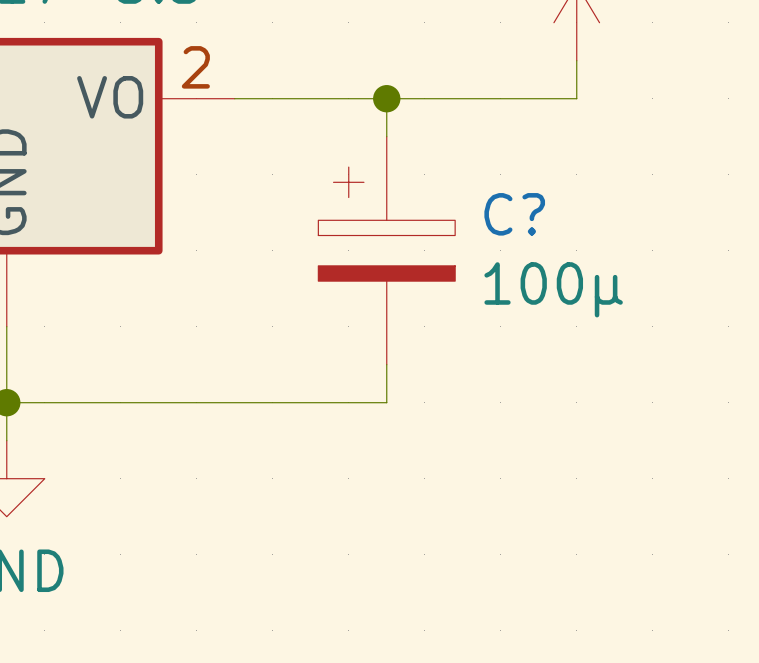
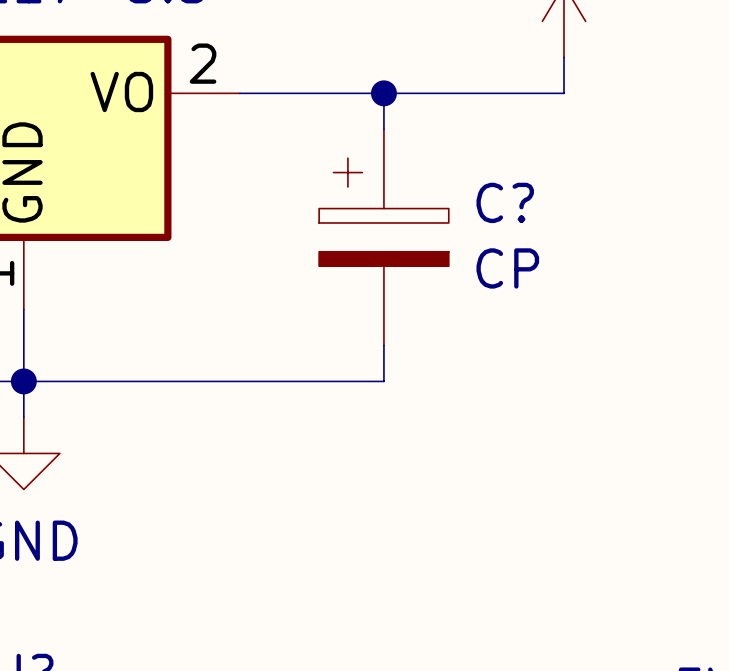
C? value: 100µ (553, 289) -> CP (507, 268)

